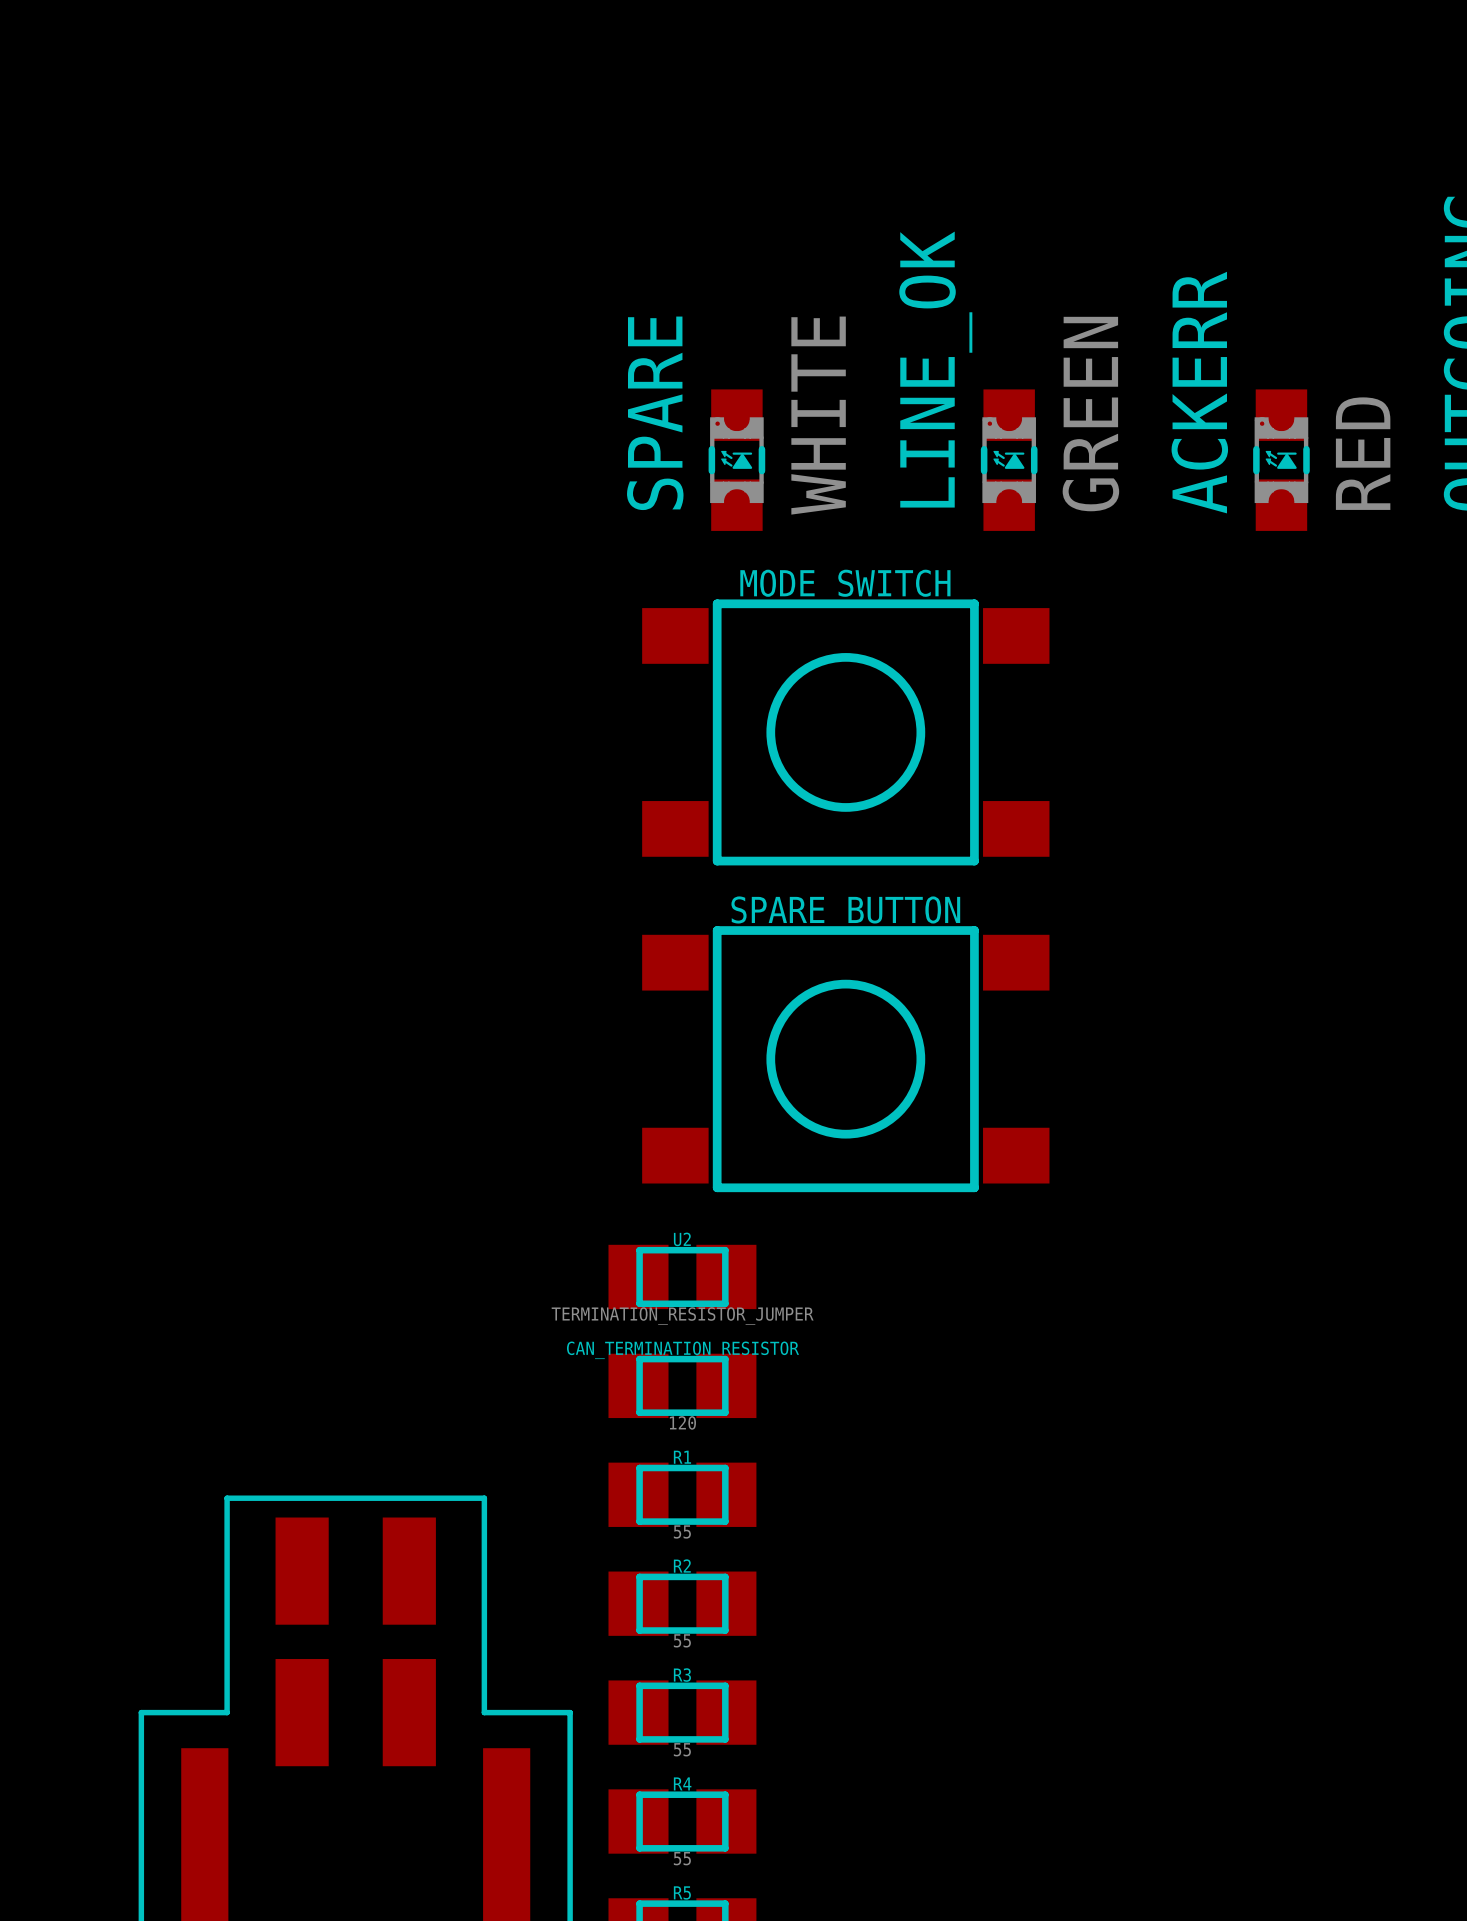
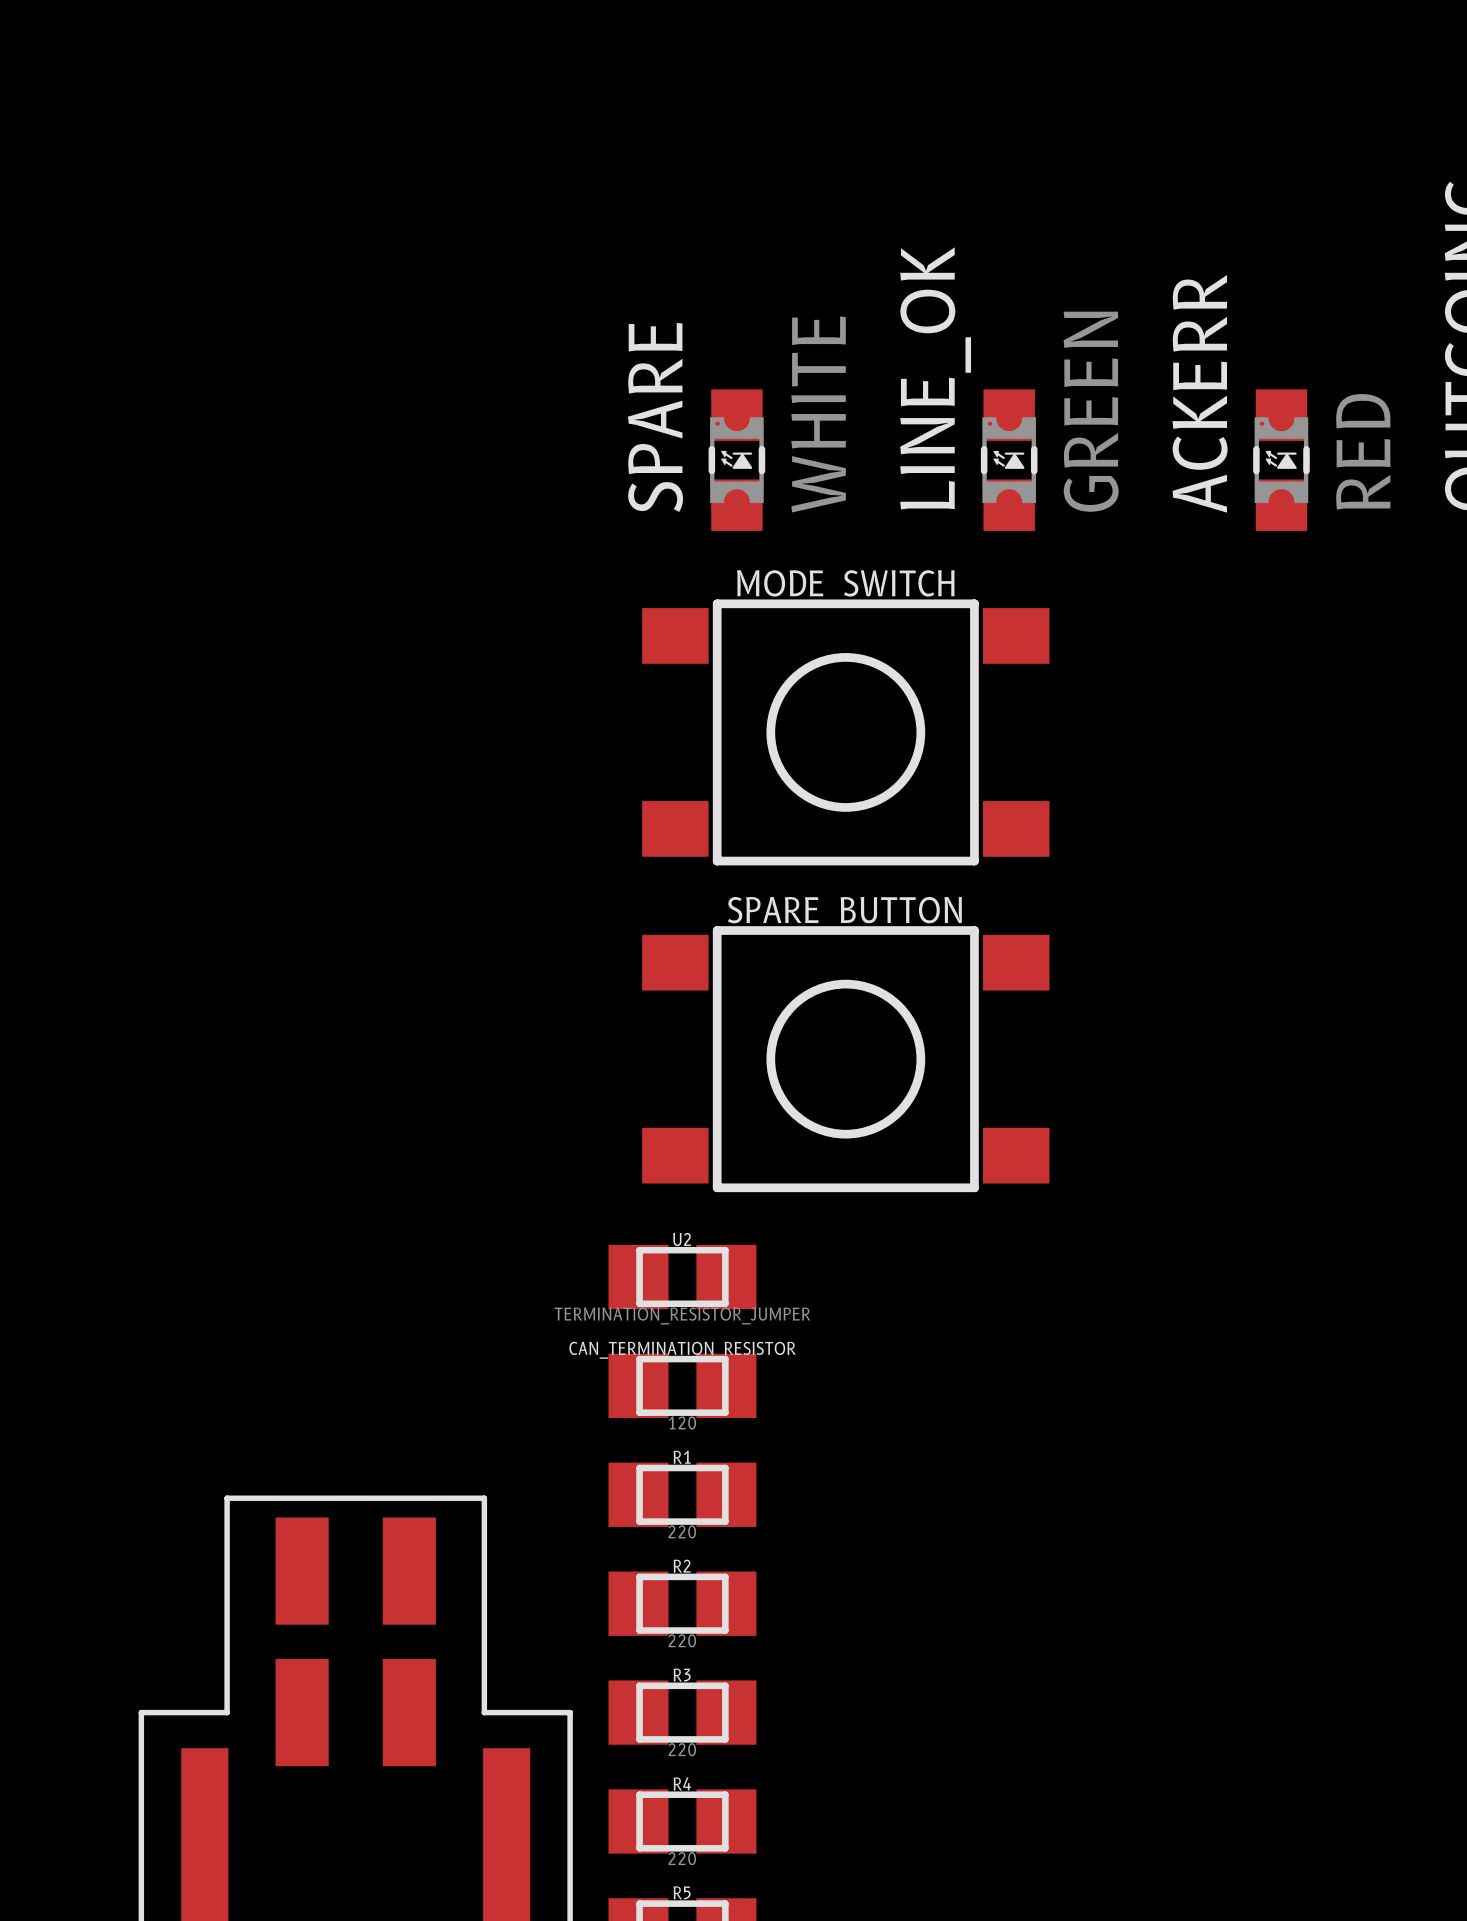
R1 value: 55 (682, 1531) -> 220 (682, 1531)
R2 value: 55 (682, 1640) -> 220 (682, 1640)
R3 value: 55 (682, 1749) -> 220 (682, 1749)
R4 value: 55 (682, 1858) -> 220 (682, 1858)

